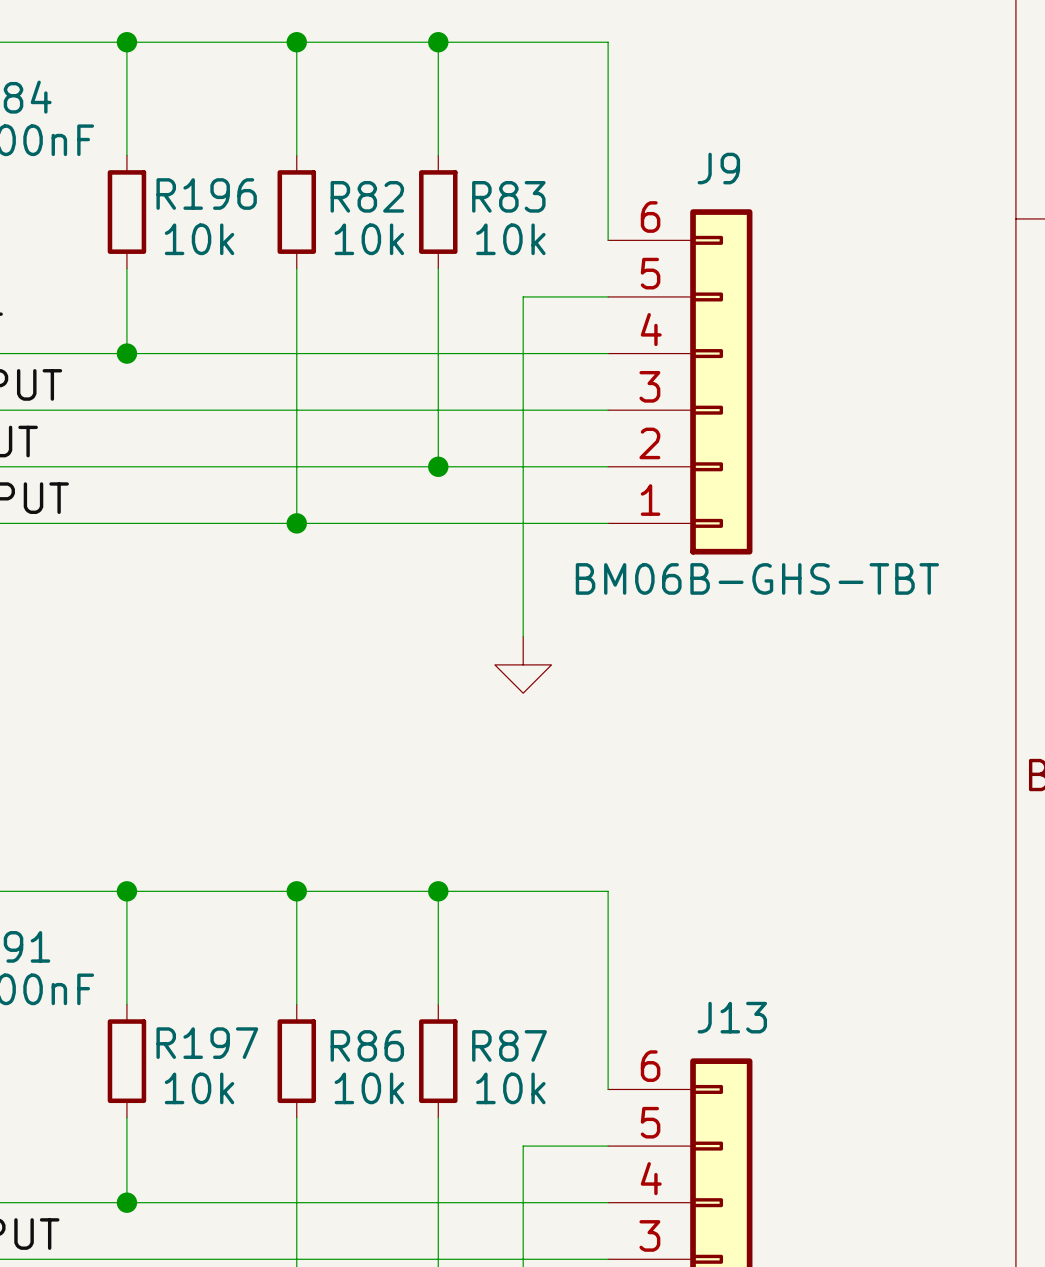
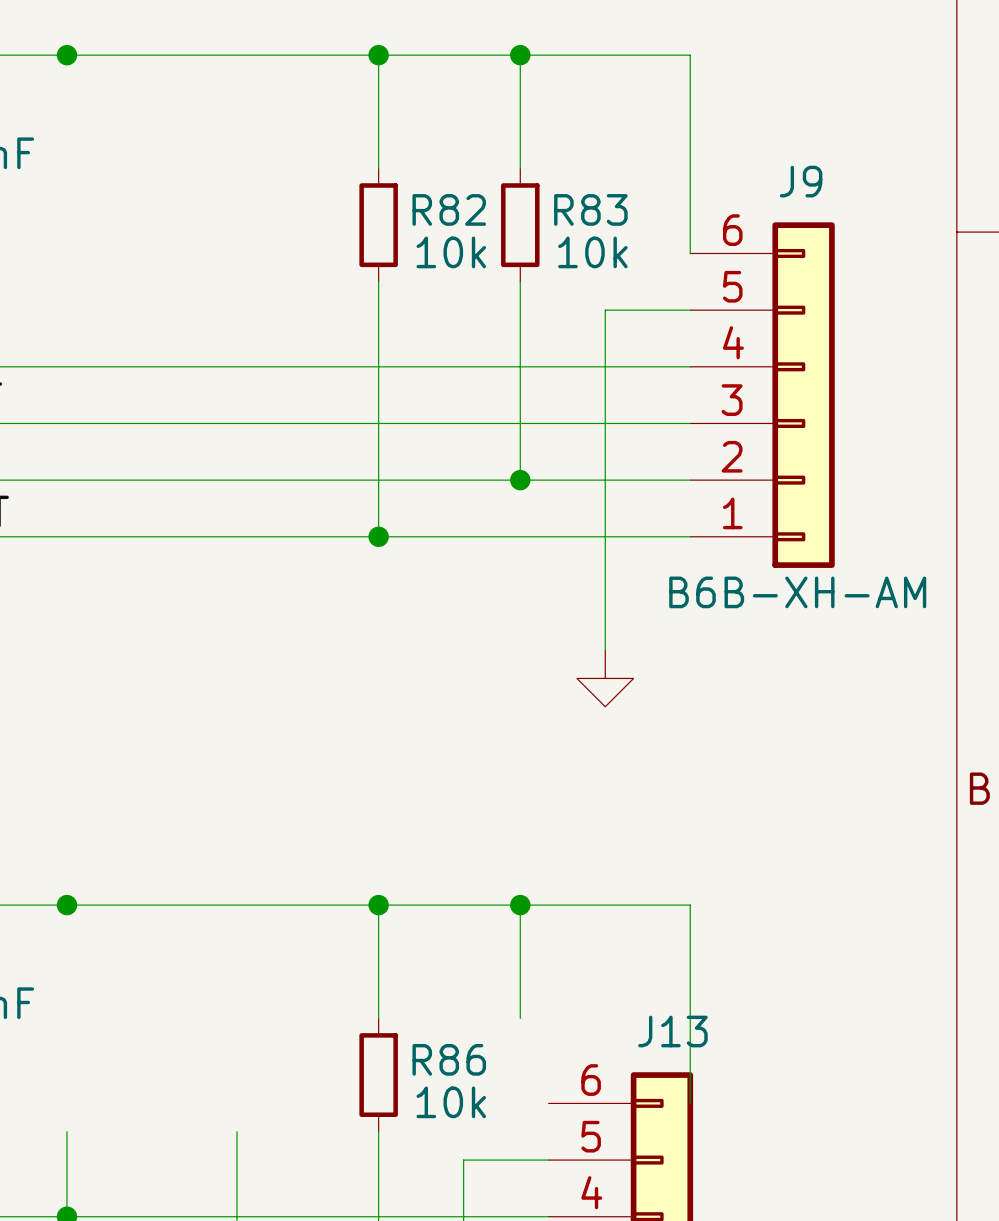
wire: (126, 42) (126, 155) -> none
wire: (296, 42) (296, 155) -> (520, 55) (520, 168)
junction: (296, 42) -> none
junction: none -> (520, 55)
wire: (608, 42) (608, 240) -> (548, 55) (690, 55) (690, 253)
R83 name: R83 (508, 196) -> R82 (449, 209)
R196: 10k (126, 212) -> none
R82: 10k (296, 212) -> none
R83: none -> 10k (520, 225)
wire: (126, 268) (126, 353) -> none
wire: (296, 268) (296, 523) -> none
wire: none -> (520, 281) (520, 480)
wire: (608, 296) (523, 296) (523, 636) -> (690, 310) (605, 310) (605, 650)
junction: (126, 353) -> none
J9 position: (680, 381) -> (762, 395)
wire: none -> (378, 480) (378, 536)
junction position: (438, 466) -> (378, 536)
junction: none -> (520, 480)
junction: (296, 523) -> none
J9 value: BM06B-GHS-TBT (757, 578) -> B6B-XH-AM (797, 592)
power symbol position: (523, 664) -> (605, 678)
wire: (126, 891) (126, 1004) -> none
wire: (296, 891) (296, 1004) -> (520, 905) (520, 1018)
junction: (296, 891) -> none
junction: none -> (520, 905)
wire: (608, 891) (608, 1089) -> (548, 905) (690, 905) (690, 1103)
R87 name: R87 (509, 1045) -> R86 (449, 1059)
R197: 10k (126, 1061) -> none
R86: 10k (296, 1061) -> none

